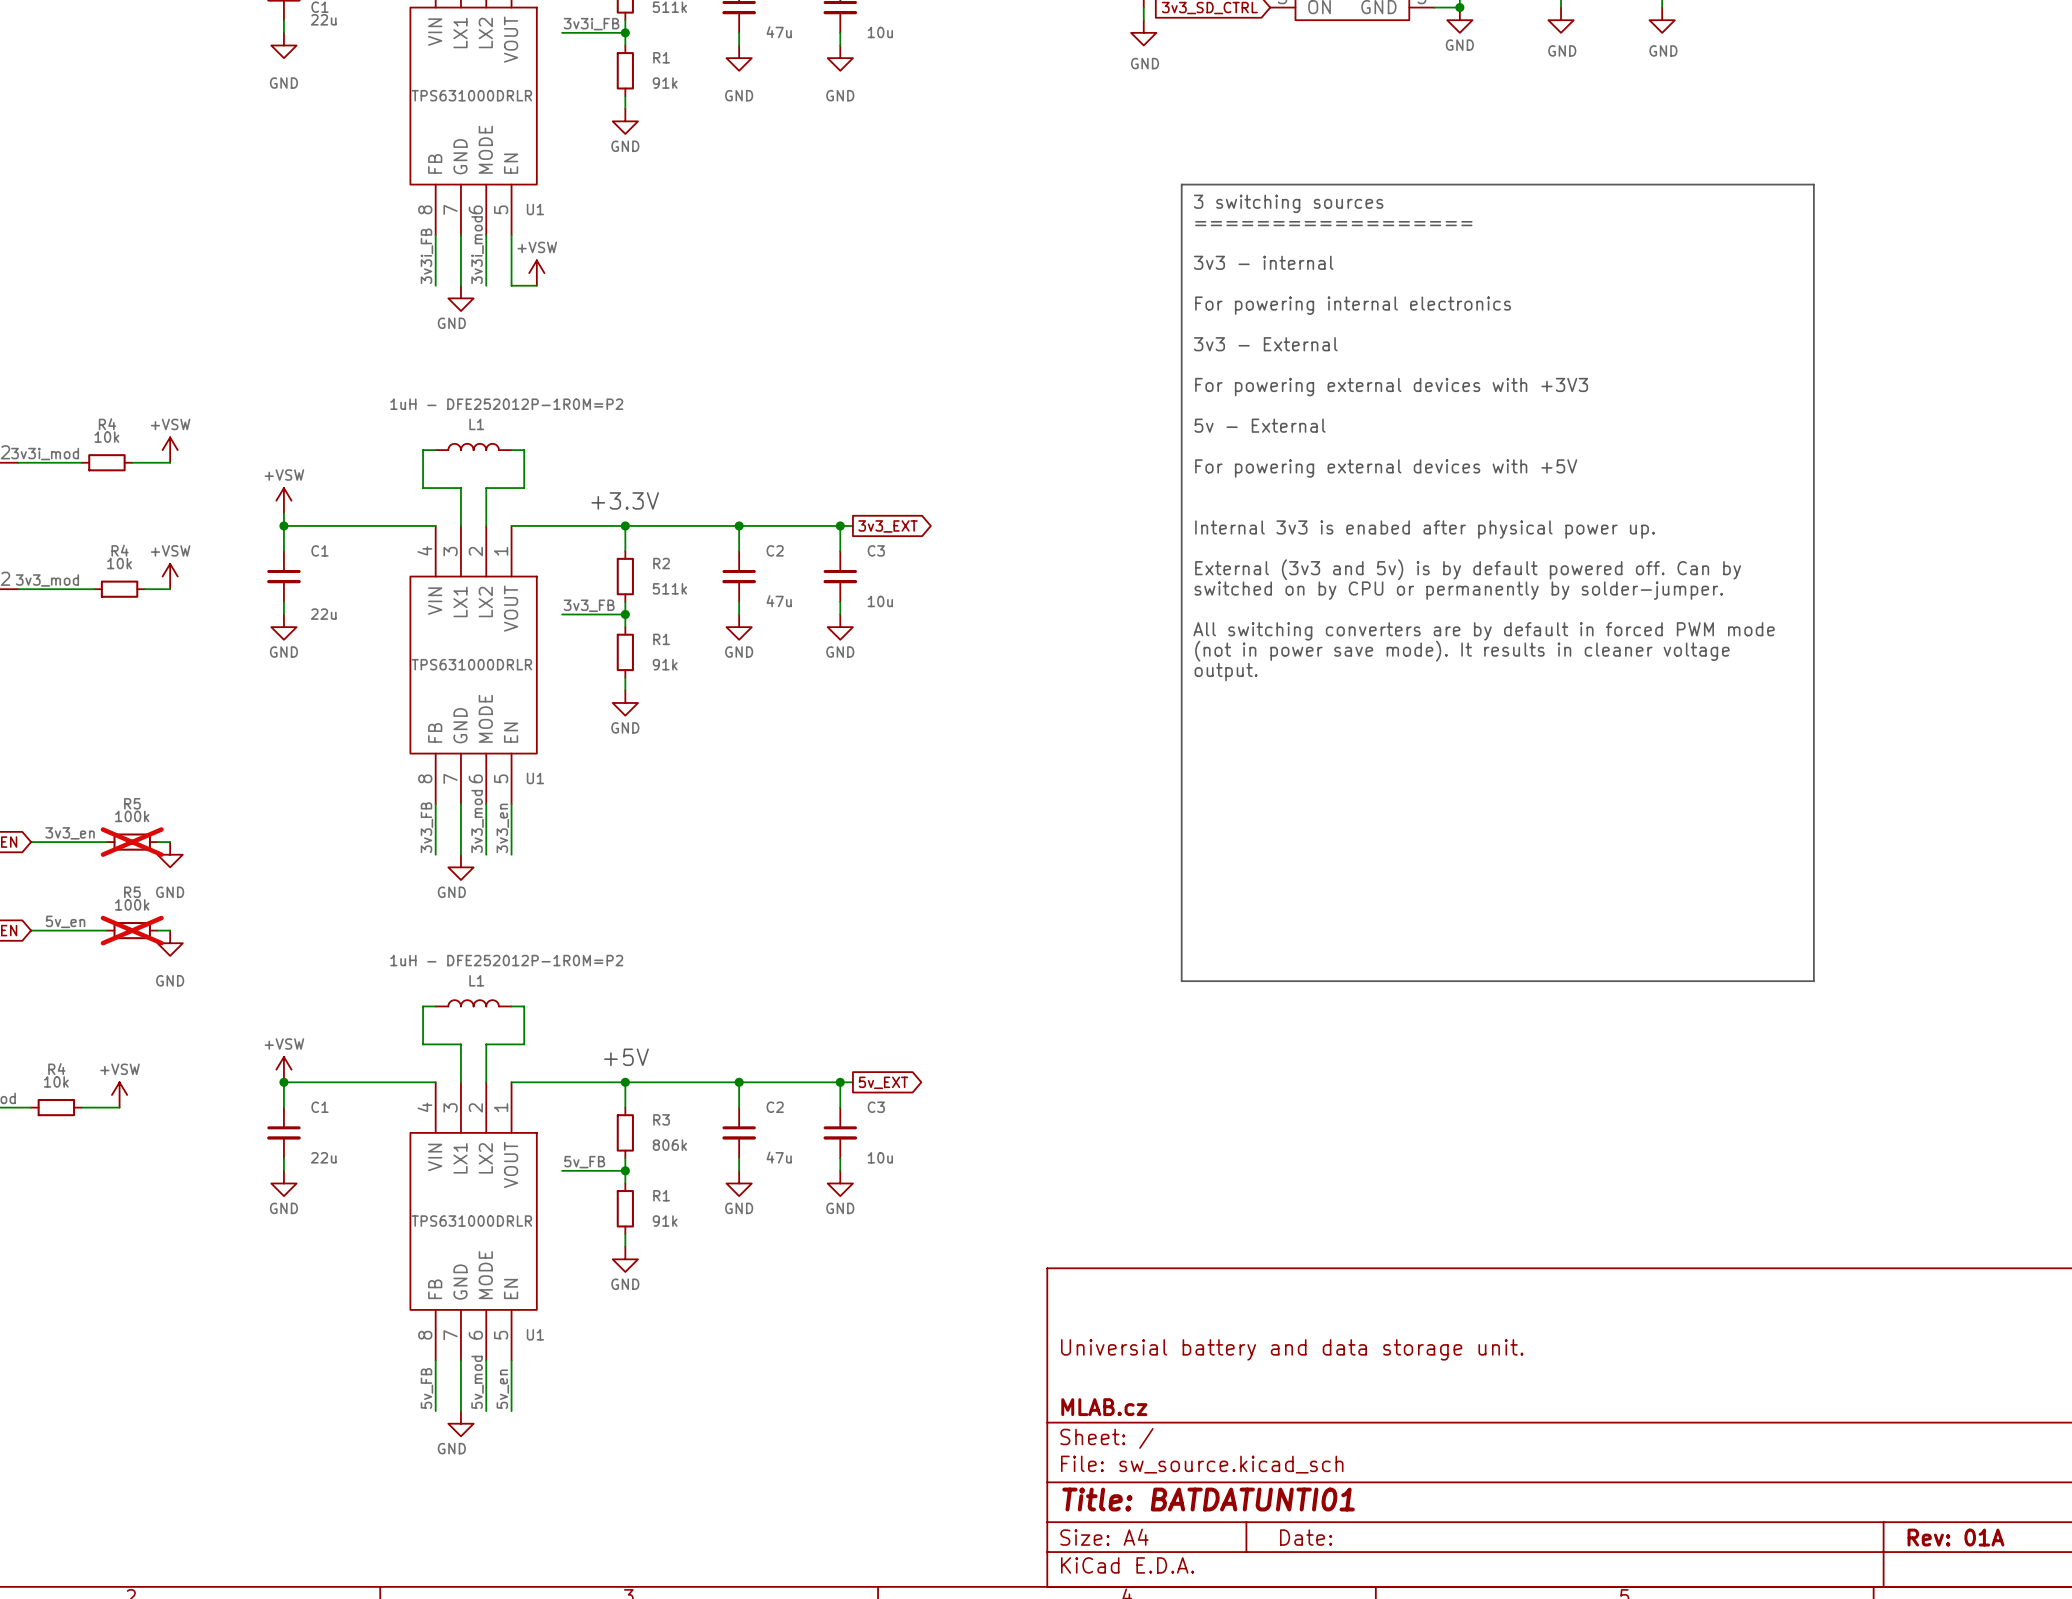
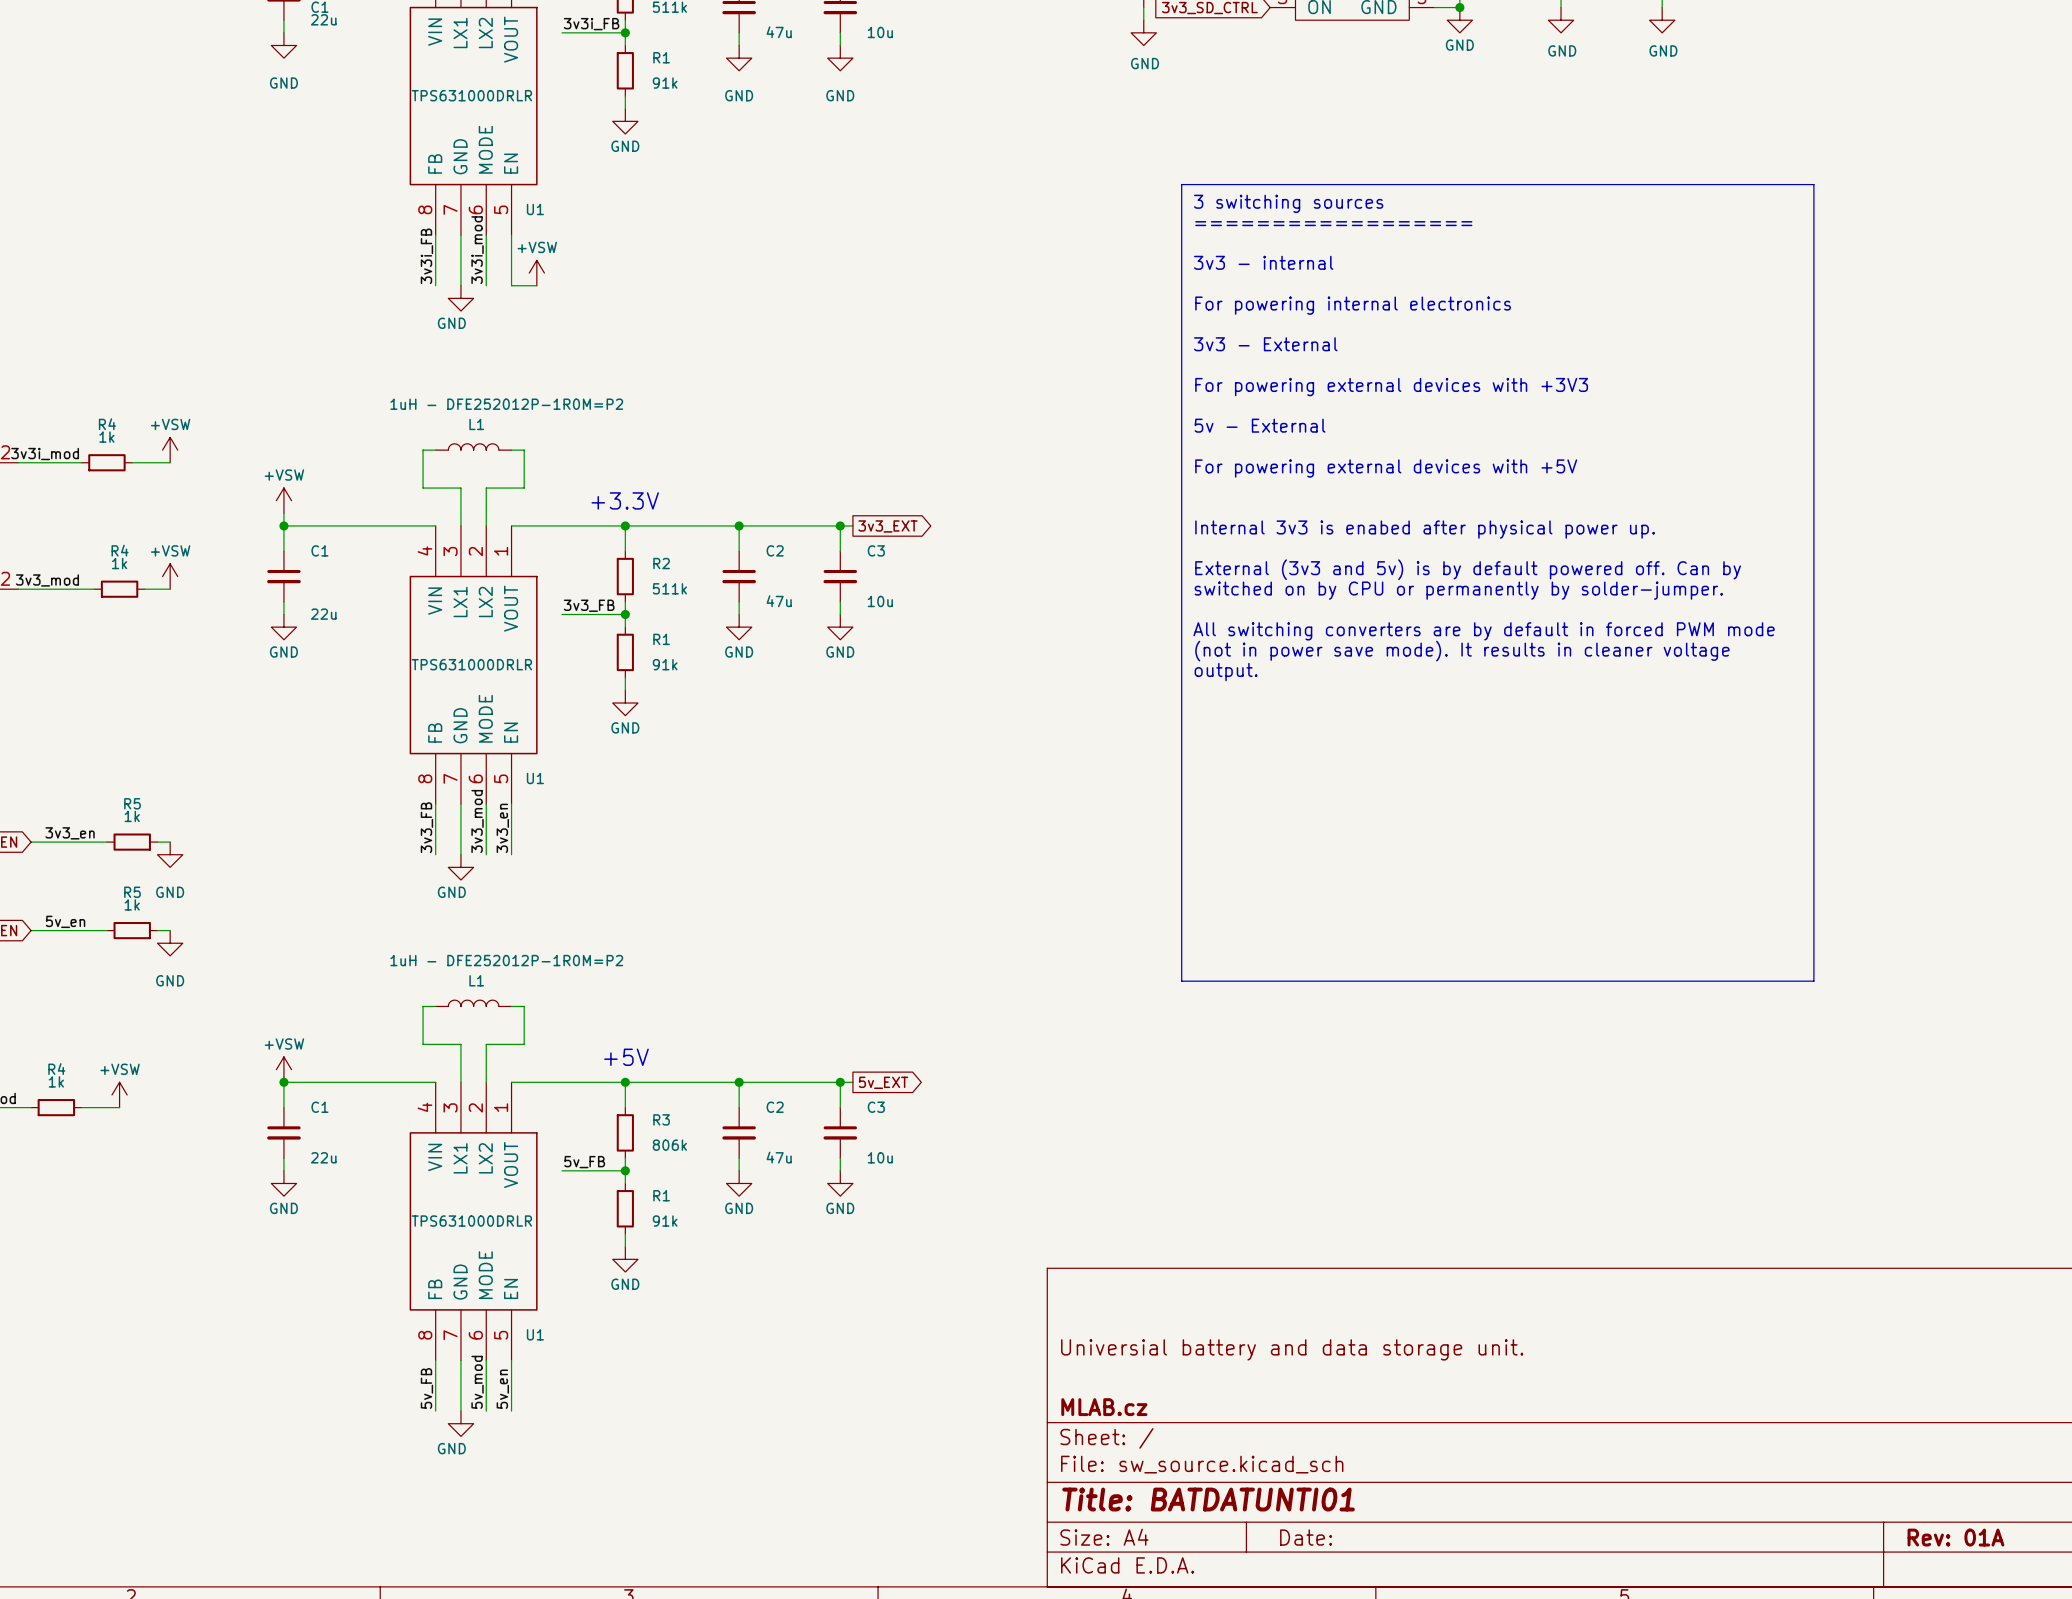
R4 value: 10k (106, 437) -> 1k (106, 437)
R4 value: 10k (119, 563) -> 1k (119, 563)
R5 value: 100k (132, 816) -> 1k (132, 816)
R5 do-not-place cross: (132, 842) -> none
R5 value: 100k (132, 904) -> 1k (132, 904)
R5 do-not-place cross: (132, 930) -> none
R4 value: 10k (56, 1081) -> 1k (56, 1081)

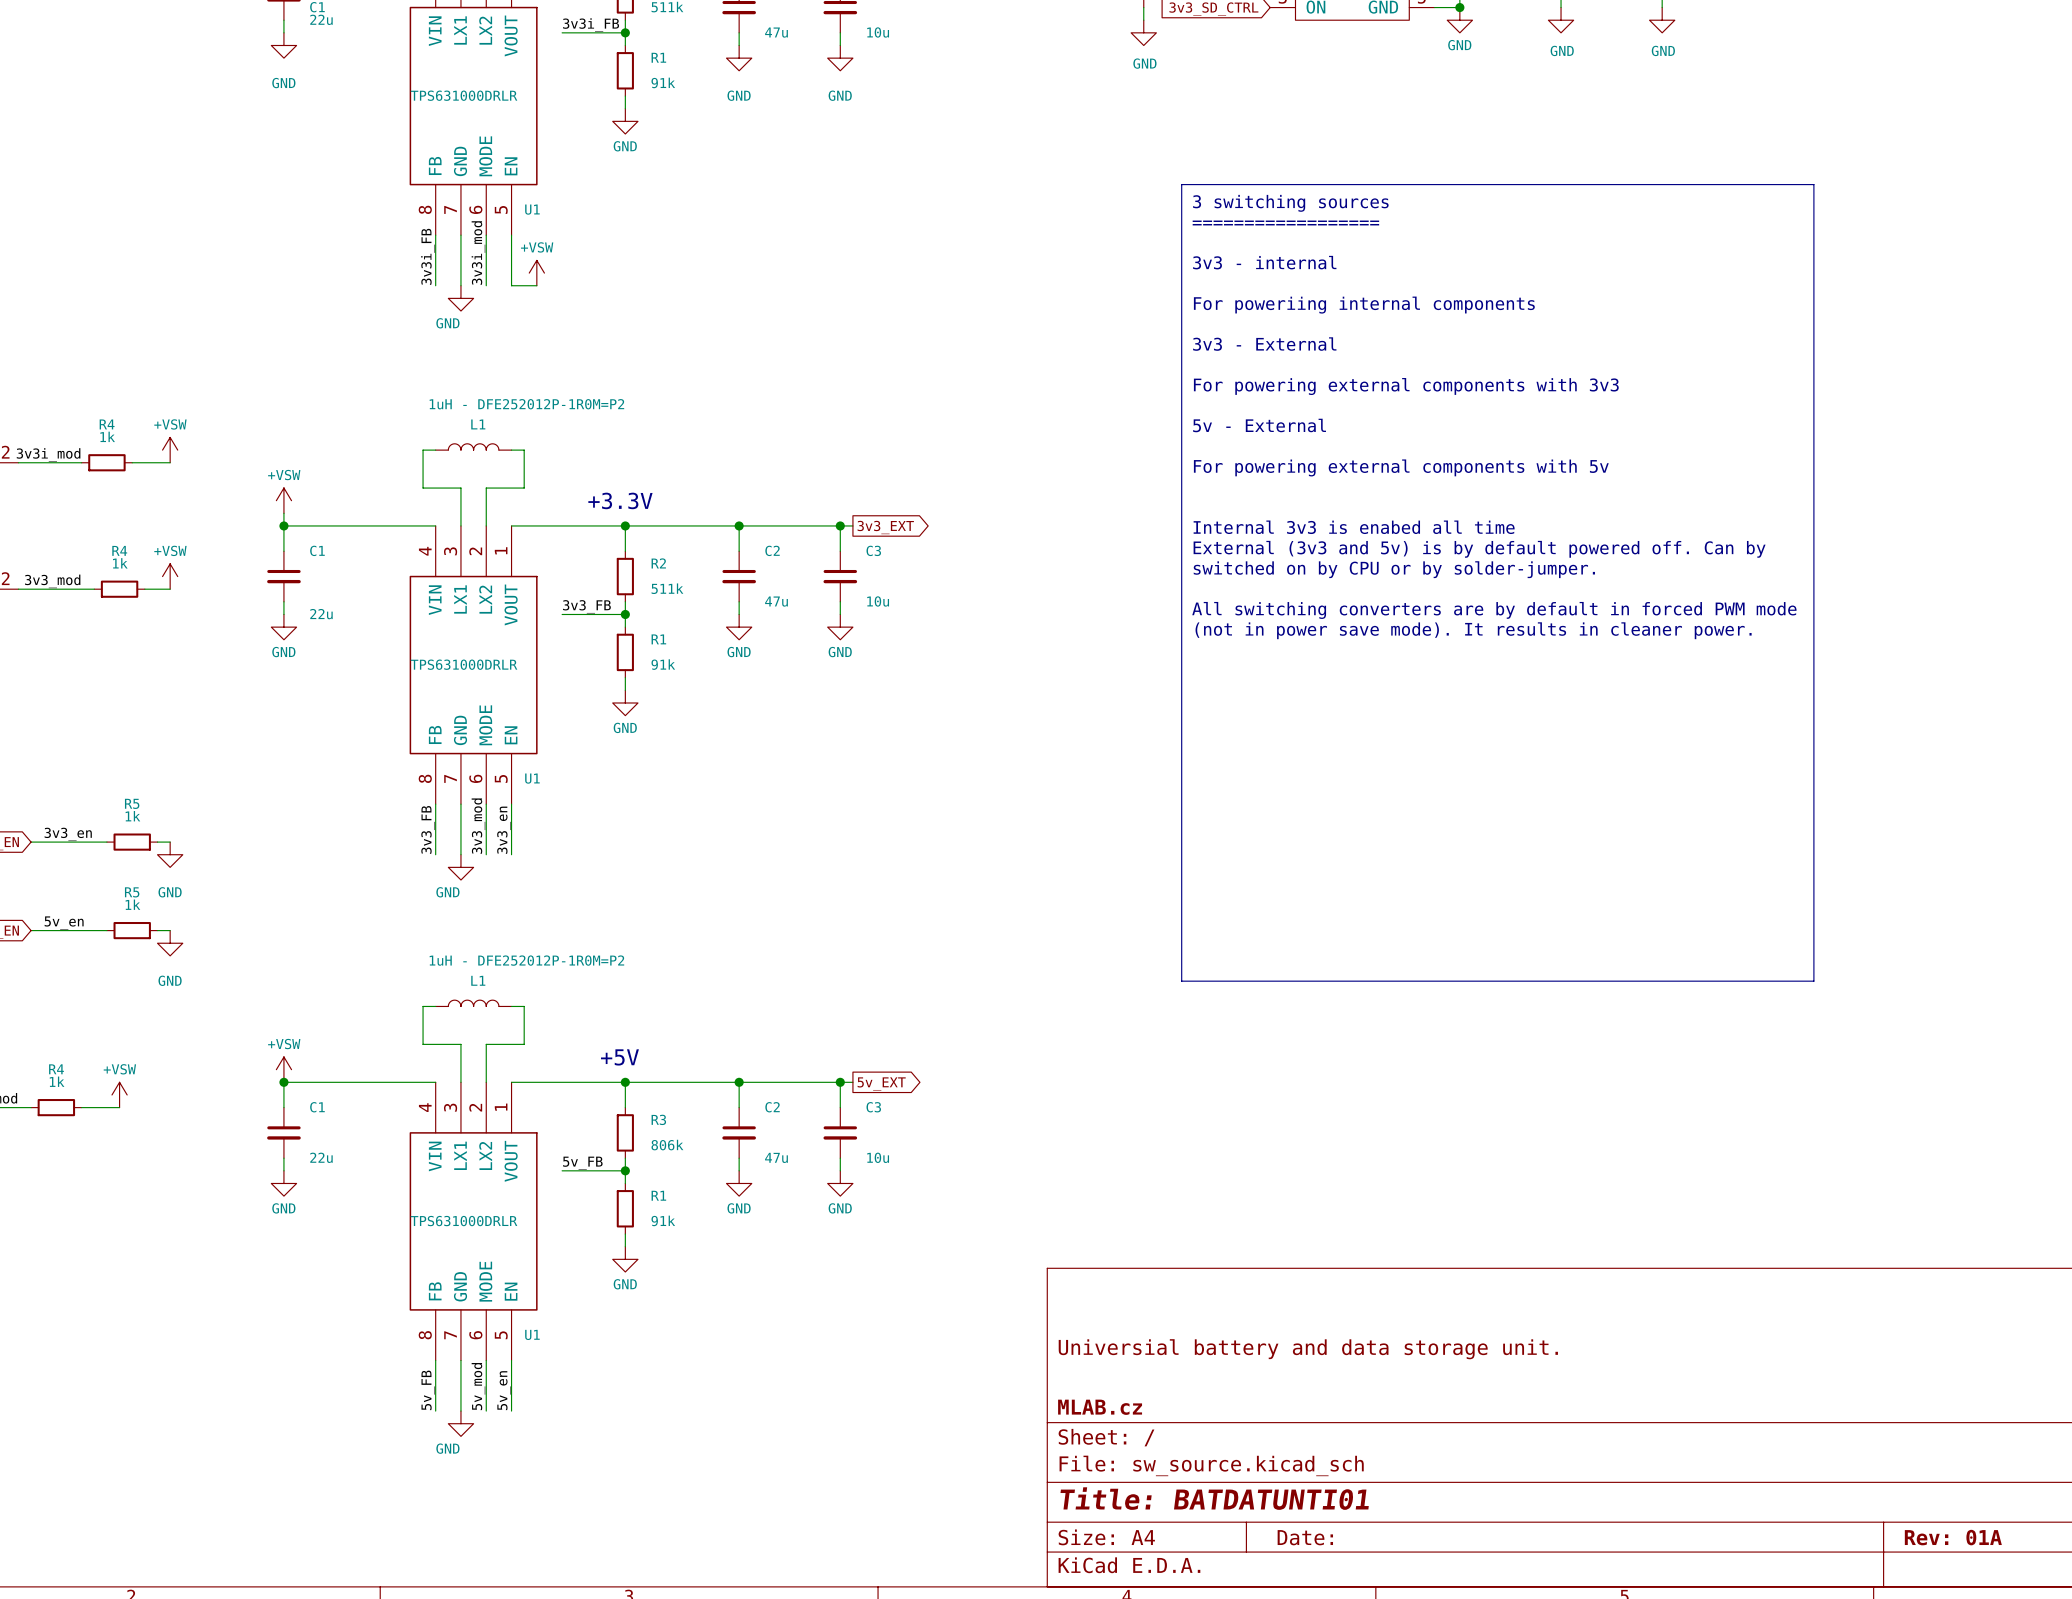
text: For powering internal electronics (1353, 305) -> For poweriing internal components (1364, 305)
text: For powering external devices with +3V3 (1391, 387) -> For powering external components with 3v3 (1406, 386)
text: For powering external devices with +5V (1386, 468) -> For powering external components with 5v (1401, 467)
text: Internal 3v3 is enabed after physical power up. (1425, 529) -> Internal 3v3 is enabed all time (1354, 527)
text: none -> External (3v3 and 5v) is by default powered off. Can by (1479, 549)
text: External (3v3 and 5v) is by default powered off. Can by (1468, 569) -> switched on by CPU or by solder-jumper. (1394, 569)
text: switched on by CPU or permanently by solder-jumper. (1458, 590) -> none
text: none -> All switching converters are by default in forced PWM mode (1494, 610)
text: All switching converters are by default in forced PWM mode (1484, 631) -> (not in power save mode). It results in cleaner power. (1473, 630)
text: (not in power save mode). It results in cleaner voltage (1462, 651) -> none
text: output. (1226, 672) -> none

